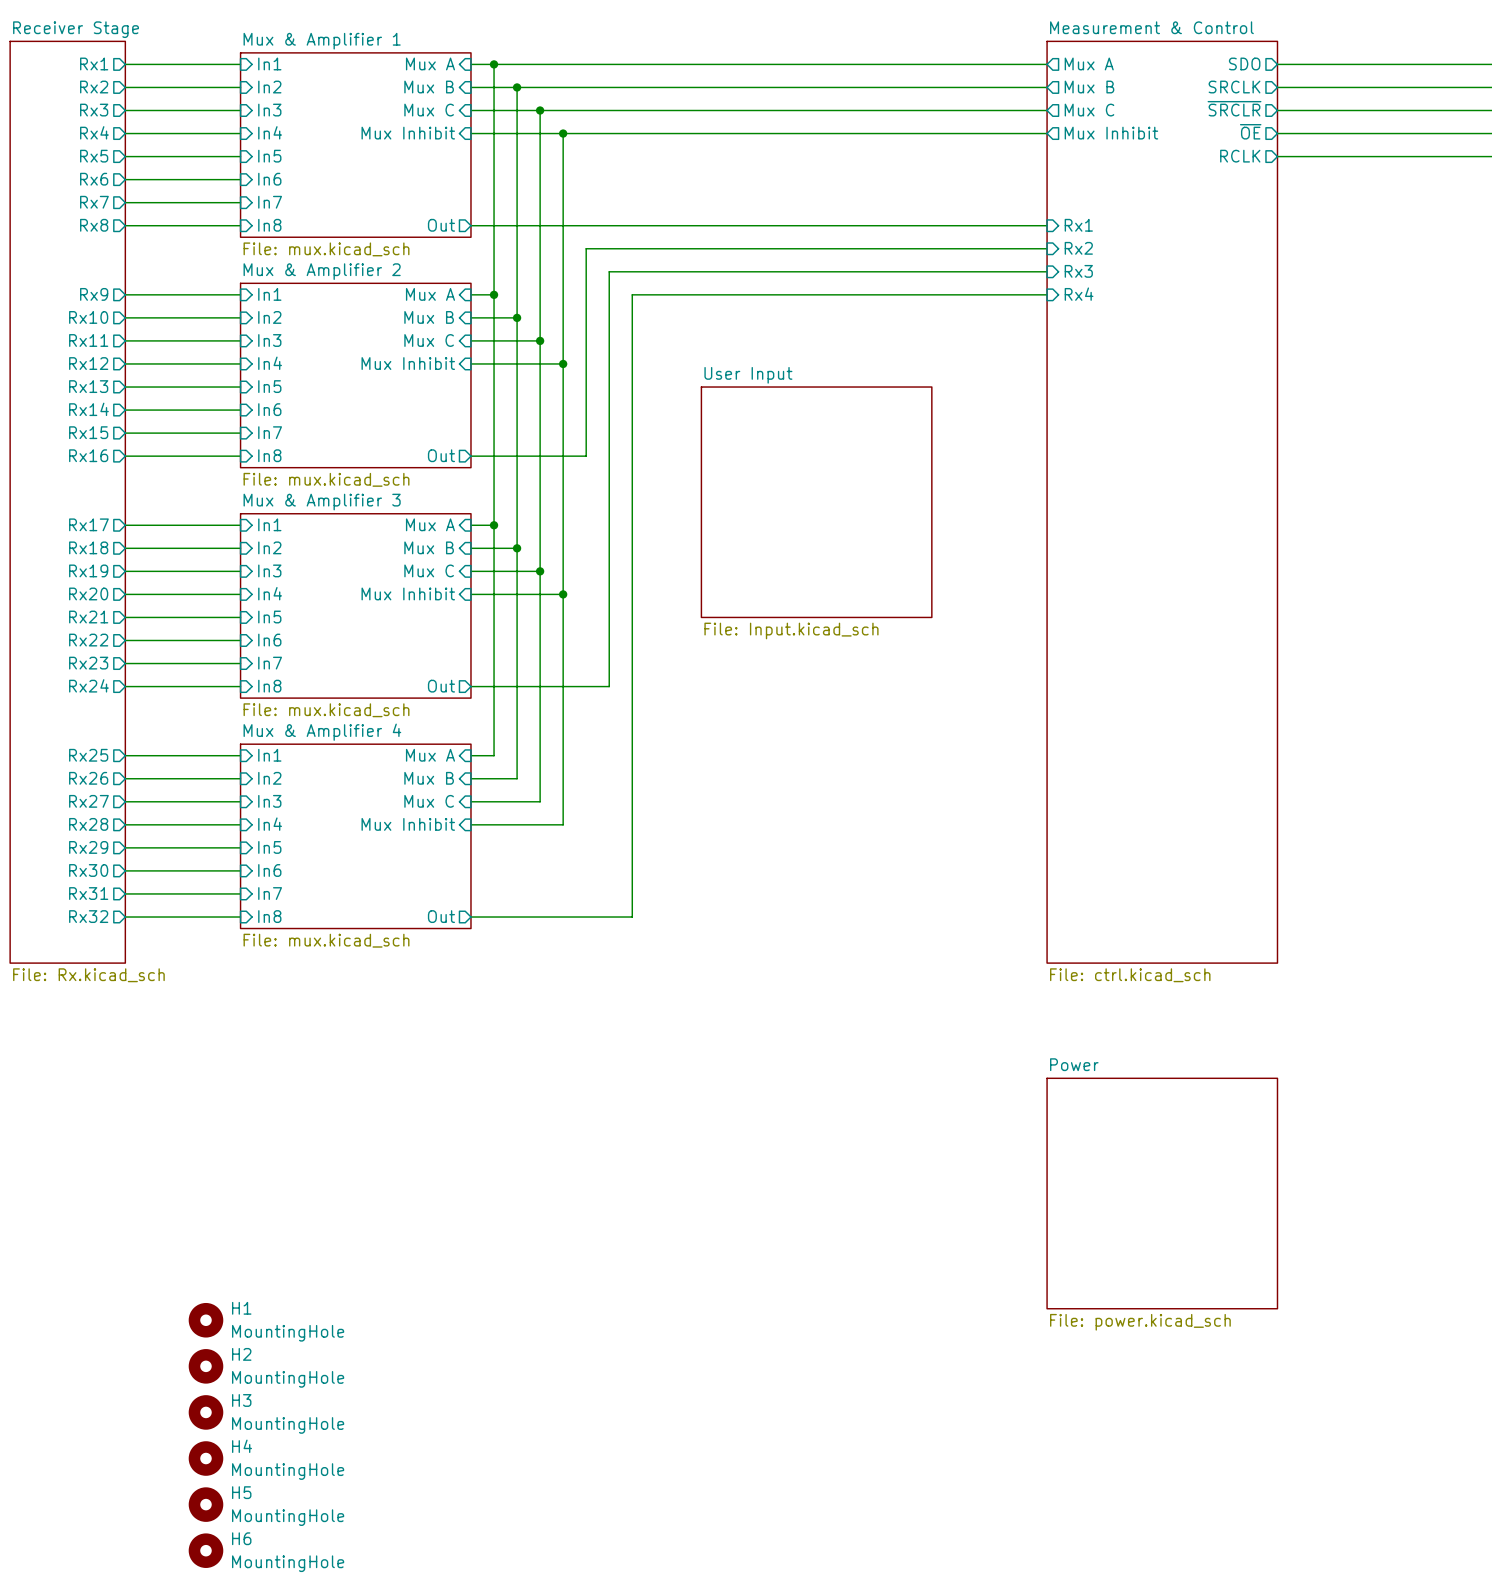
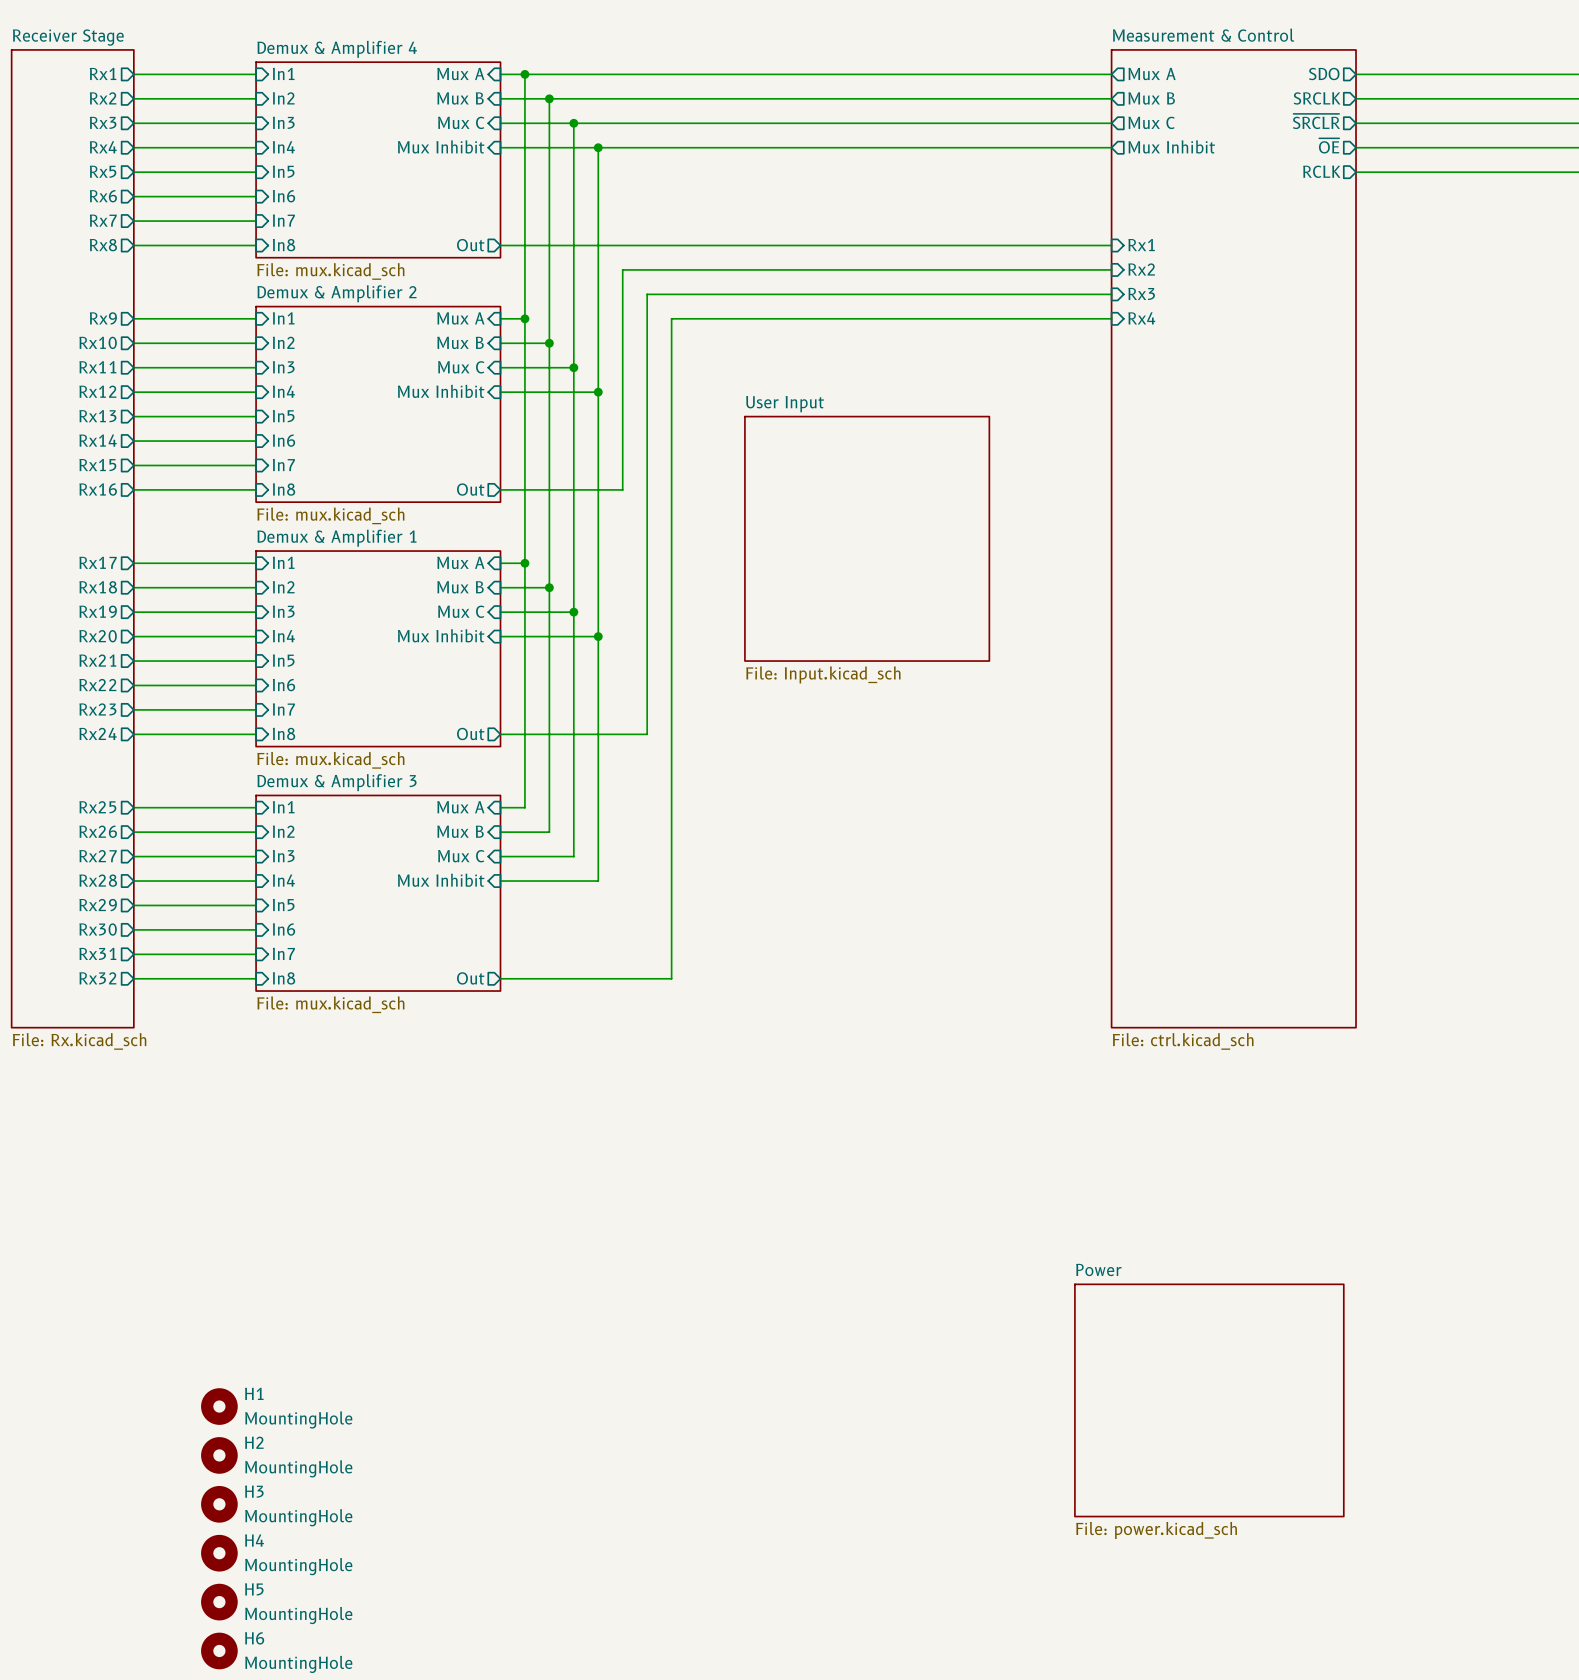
sheet Mux & Amplifier 1 name: Mux & Amplifier 1 (322, 41) -> Demux & Amplifier 4 (337, 49)
sheet Mux & Amplifier 2 name: Mux & Amplifier 2 (322, 271) -> Demux & Amplifier 2 (336, 293)
sheet Mux & Amplifier 3 name: Mux & Amplifier 3 (322, 502) -> Demux & Amplifier 1 (336, 538)
sheet Mux & Amplifier 4 name: Mux & Amplifier 4 (322, 732) -> Demux & Amplifier 3 (336, 782)
sheet Power: File: power.kicad_sch (1162, 1193) -> none
sheet Power: none -> File: power.kicad_sch (1209, 1400)

